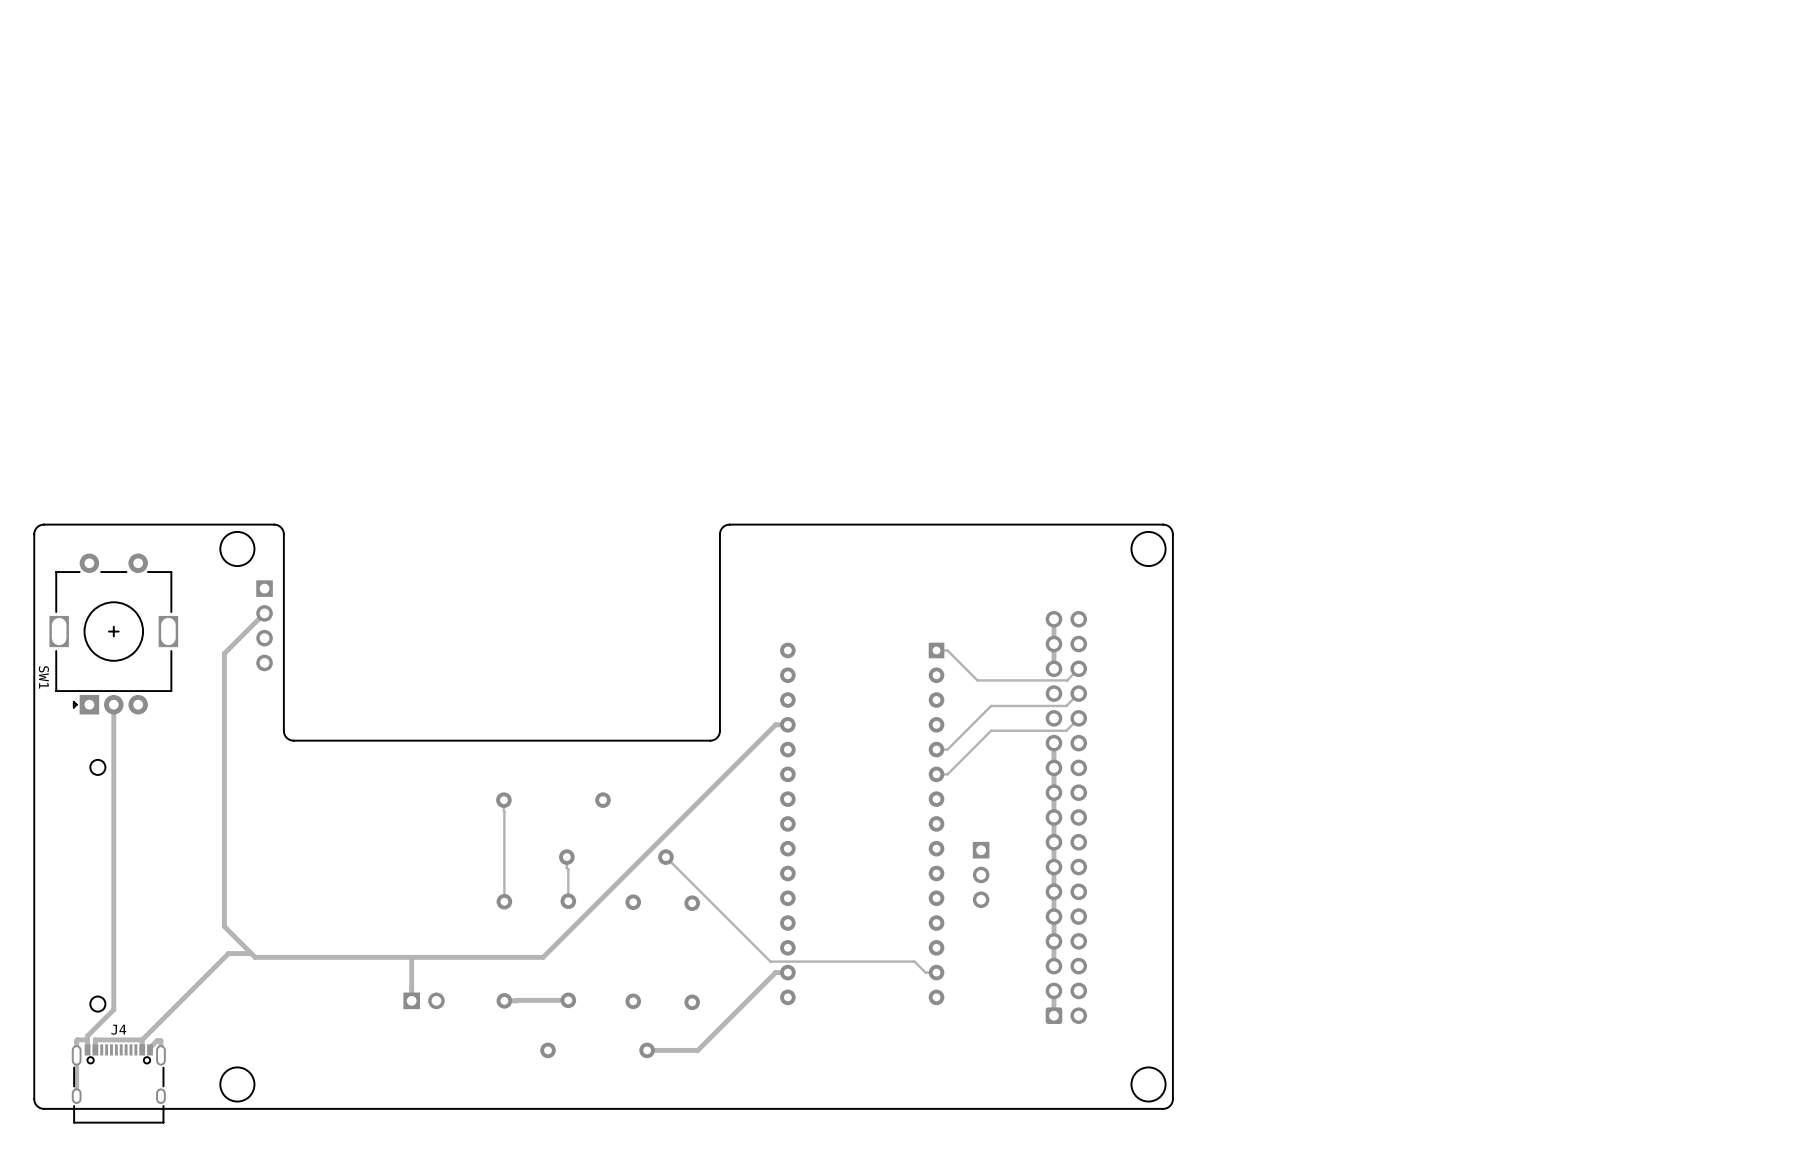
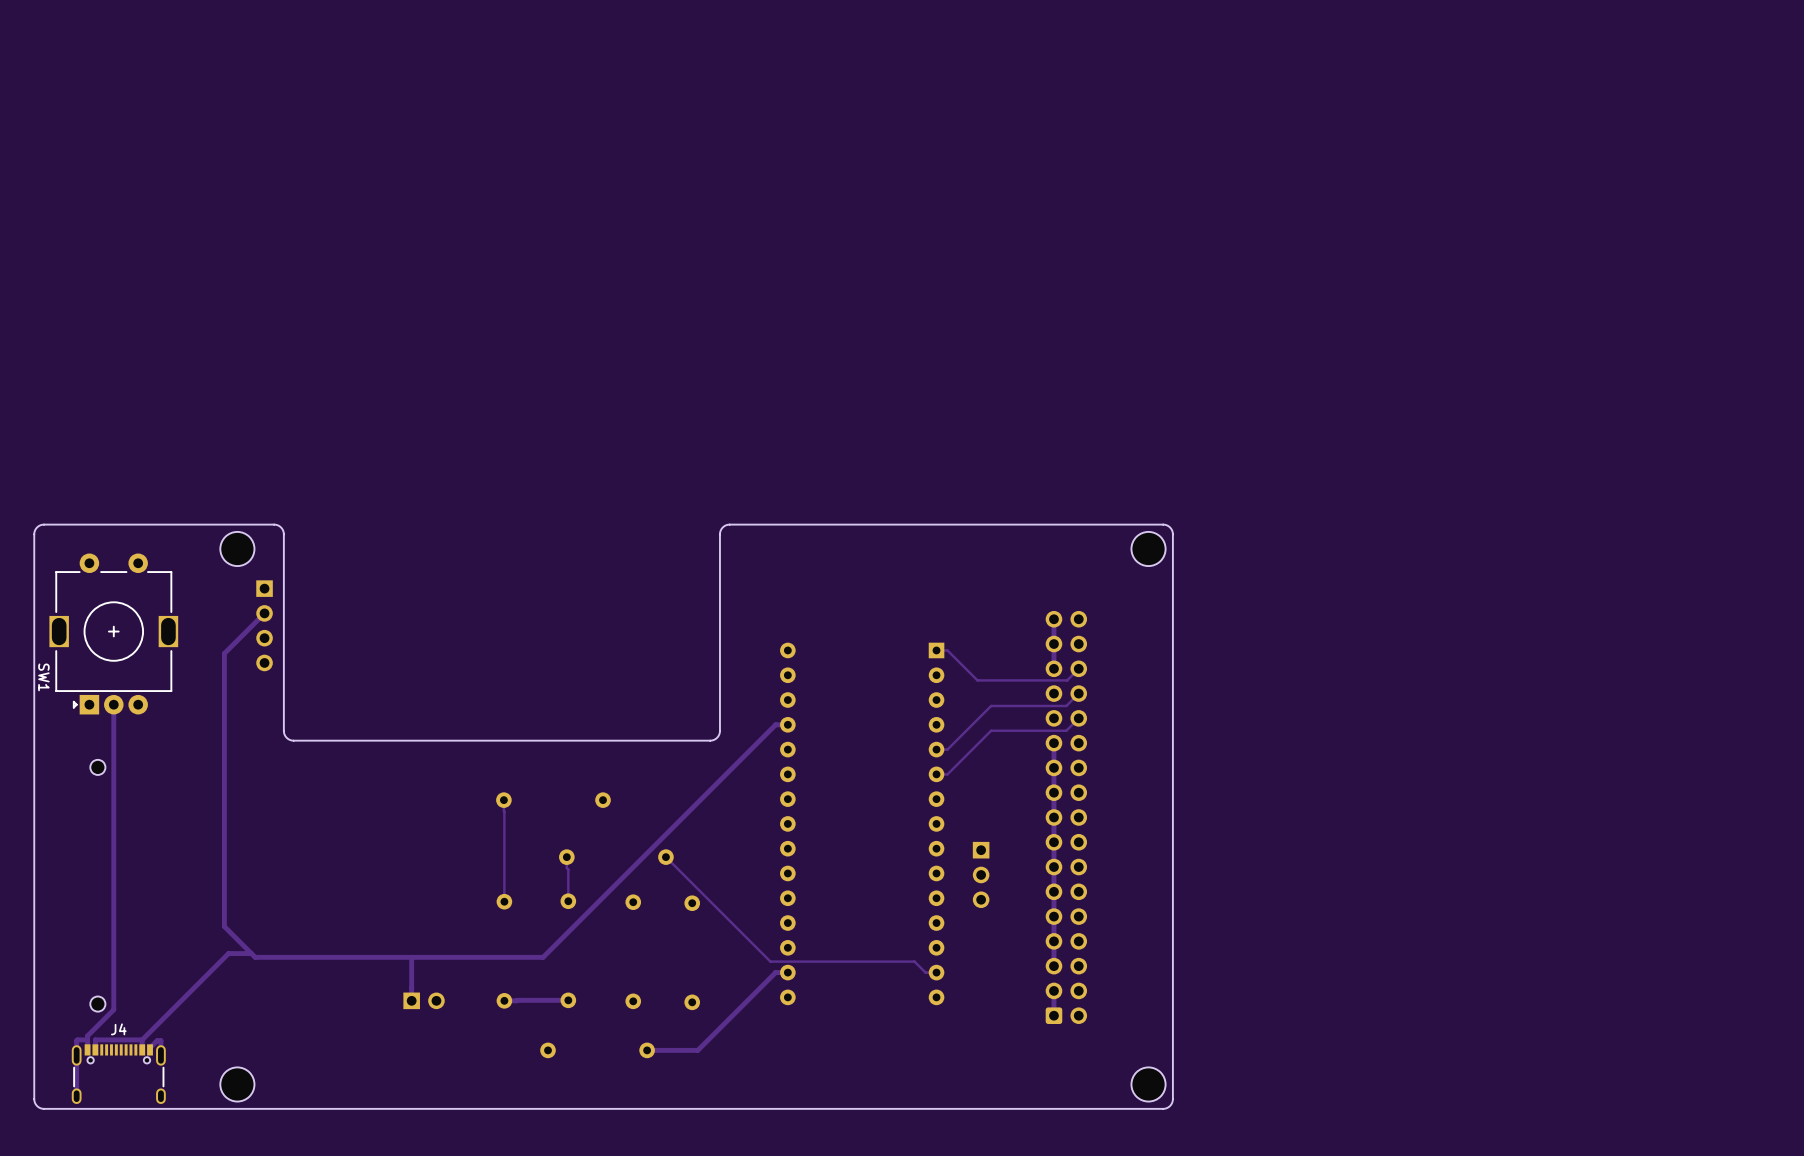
J4 footprint: [71, 1044, 166, 1124] -> [71, 1044, 166, 1105]

